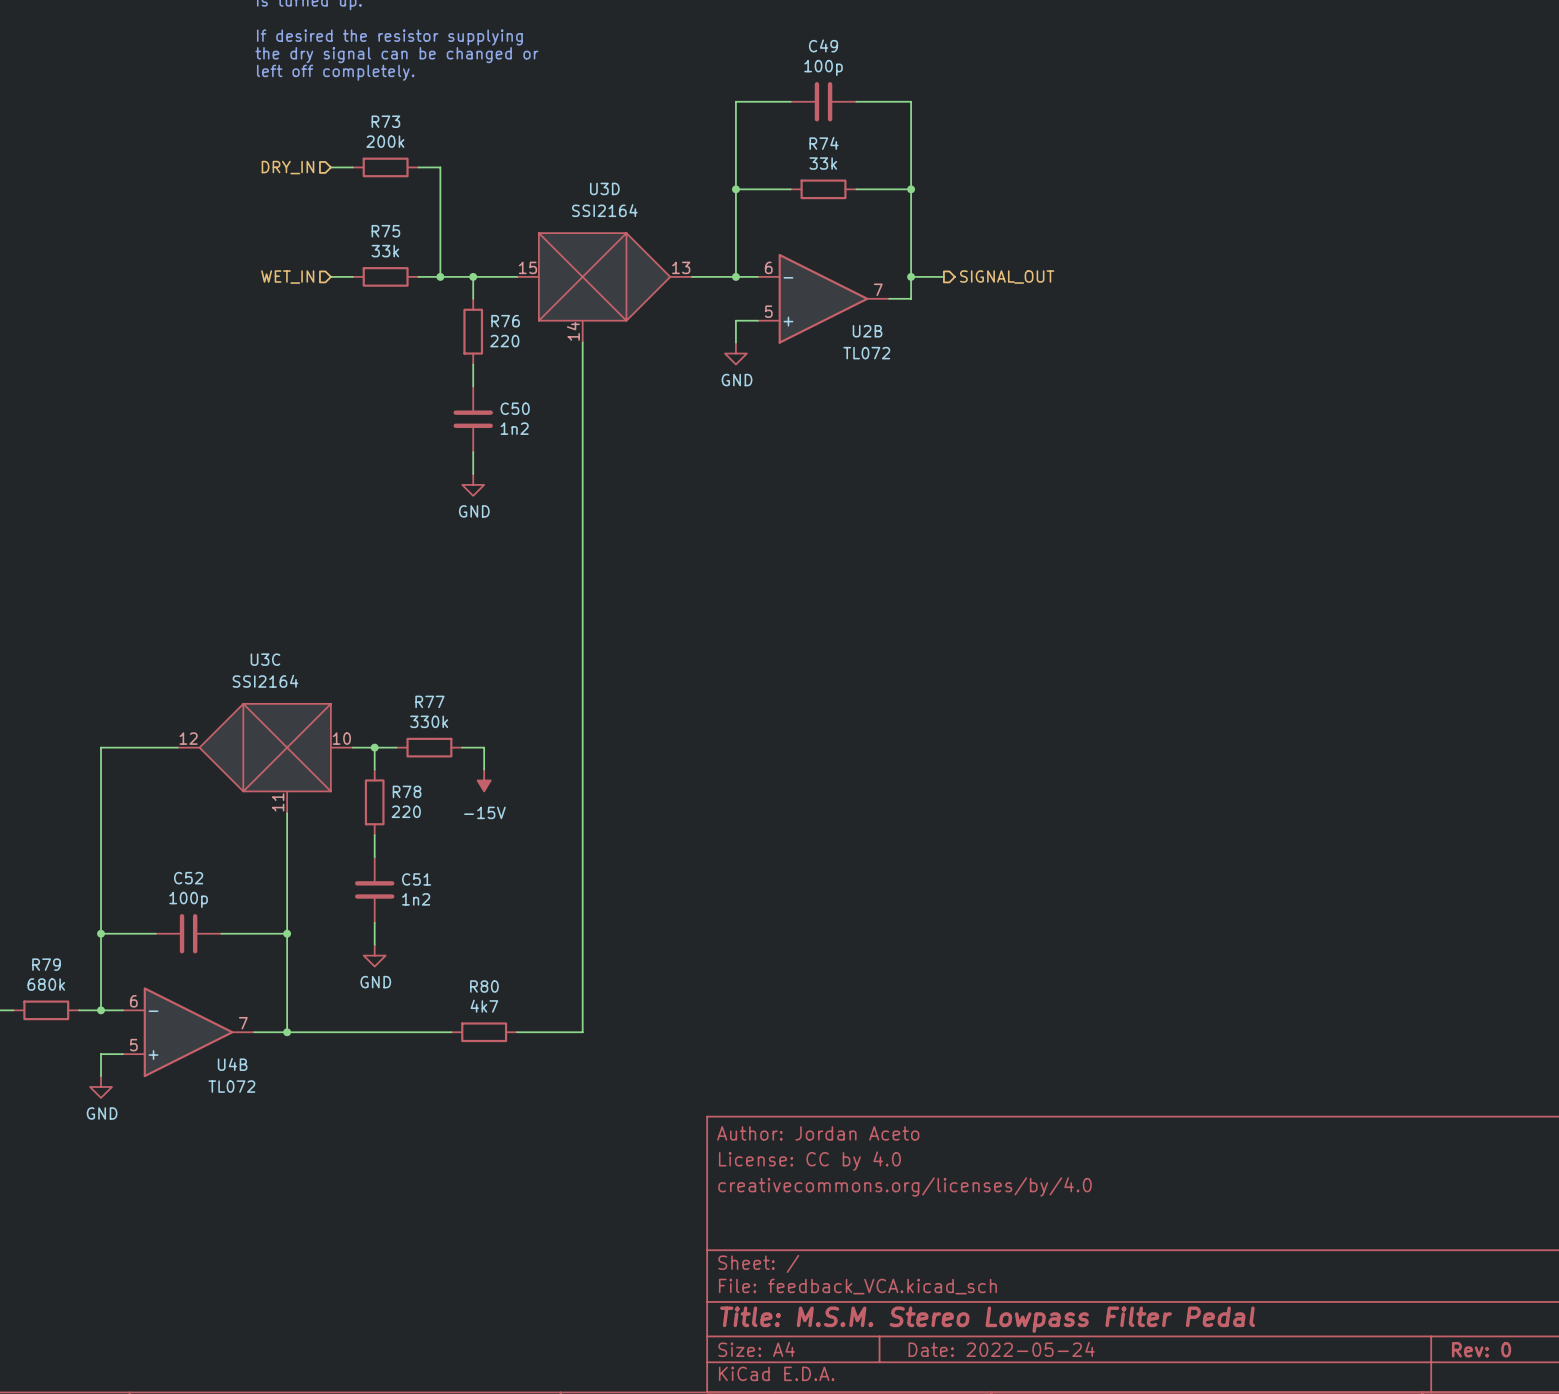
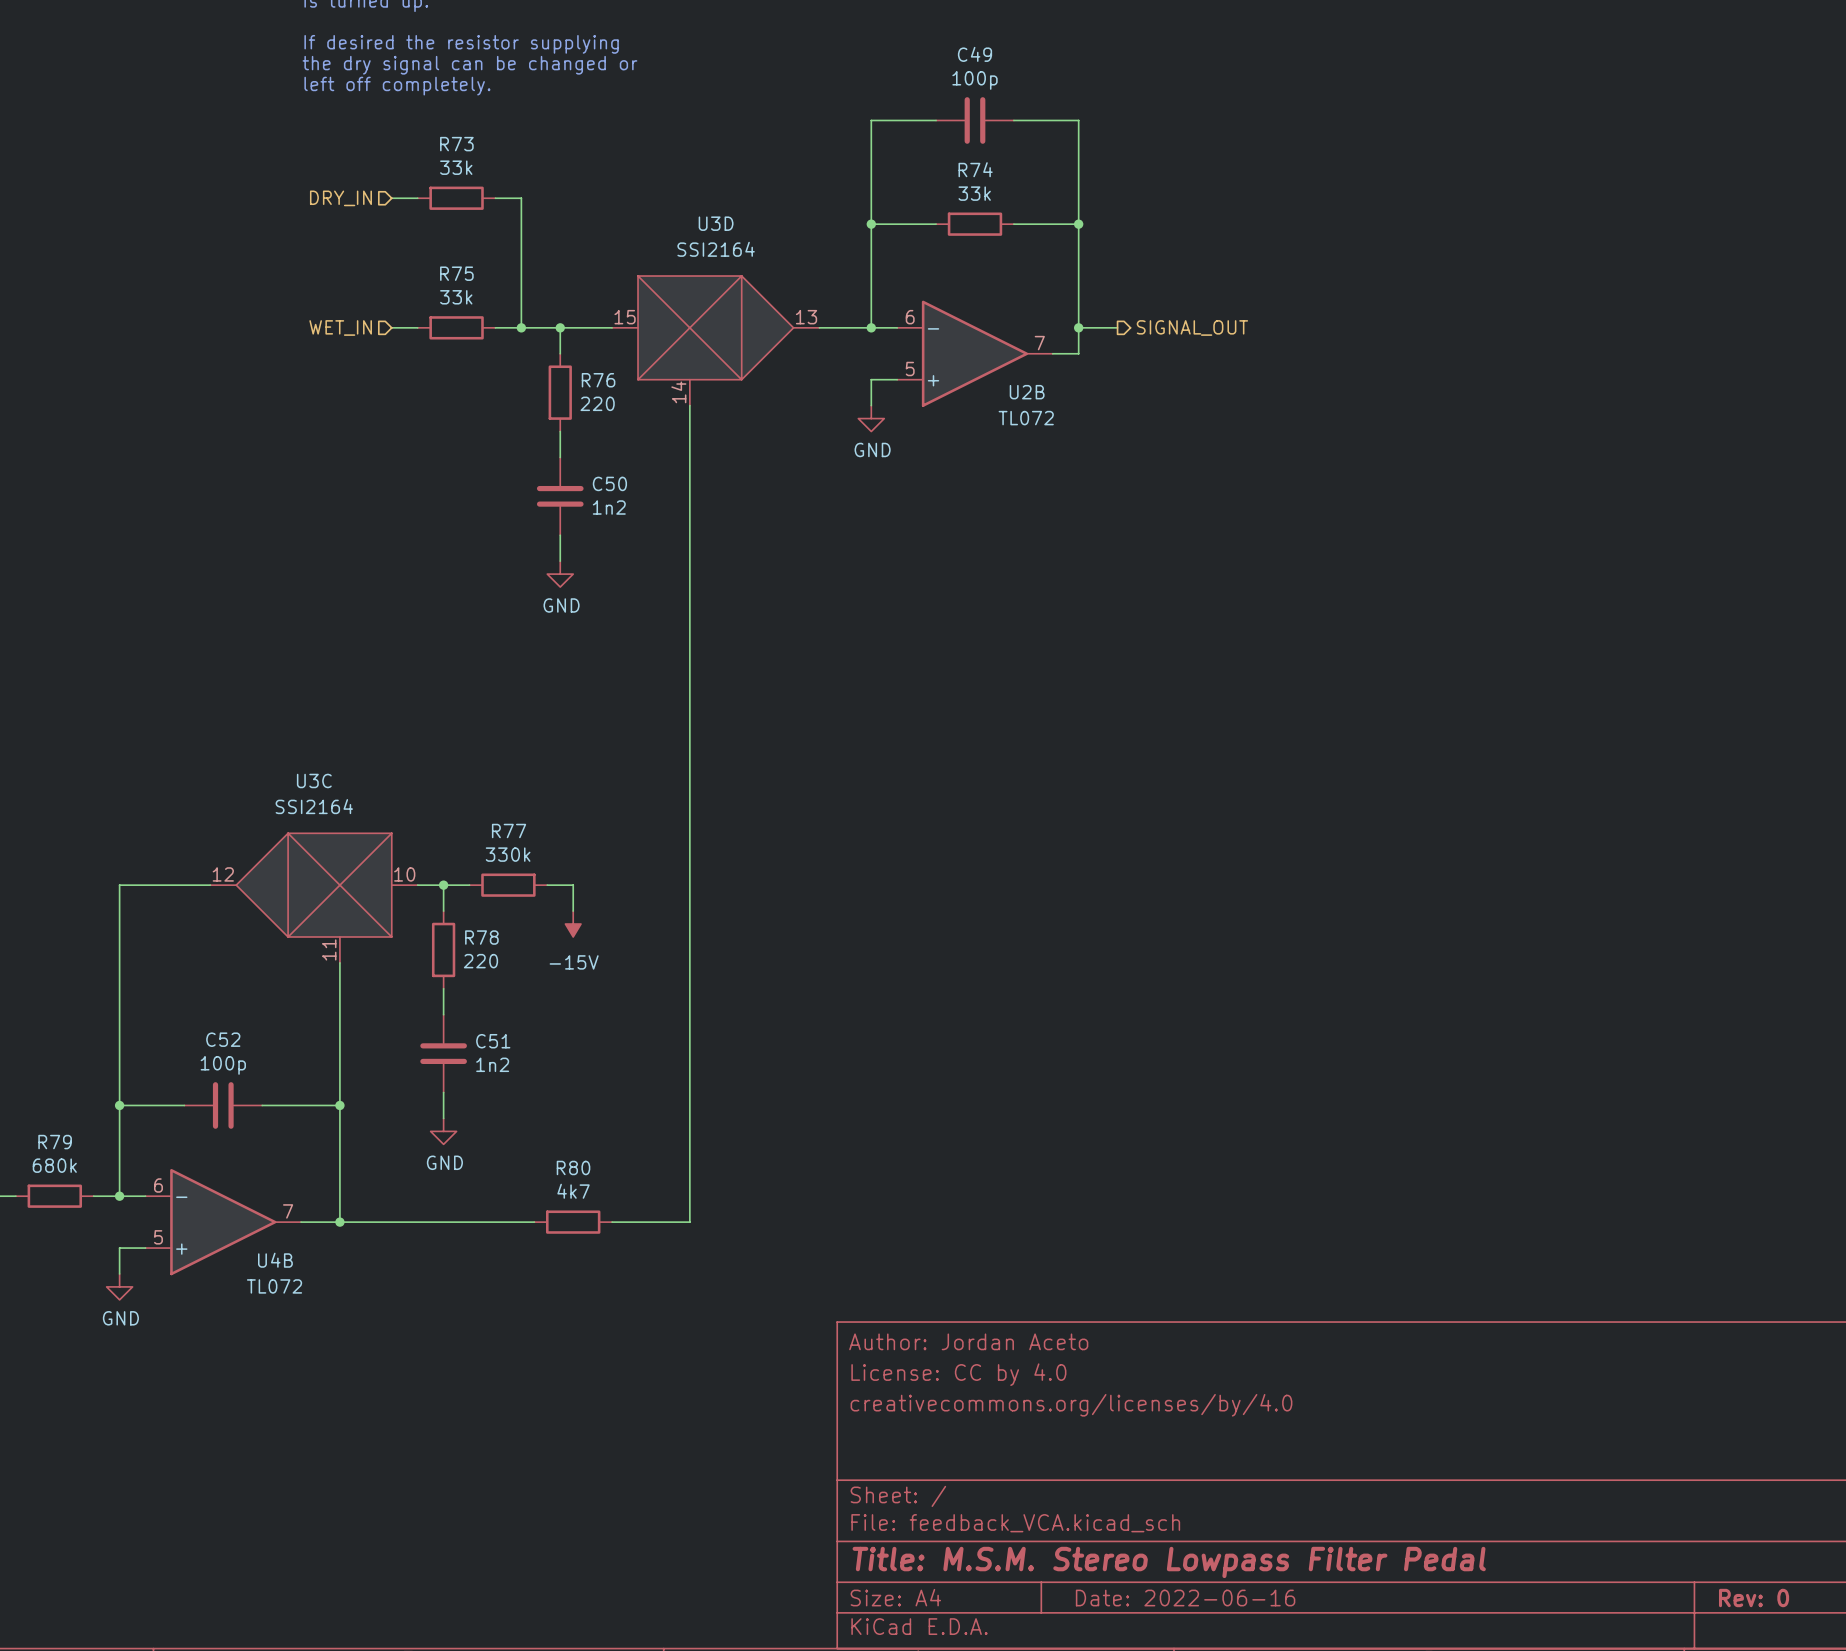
R73 value: 200k (385, 141) -> 33k (456, 167)
title block: Date: 2022-05-24 (1001, 1349) -> Date: 2022-06-16 (1185, 1598)

